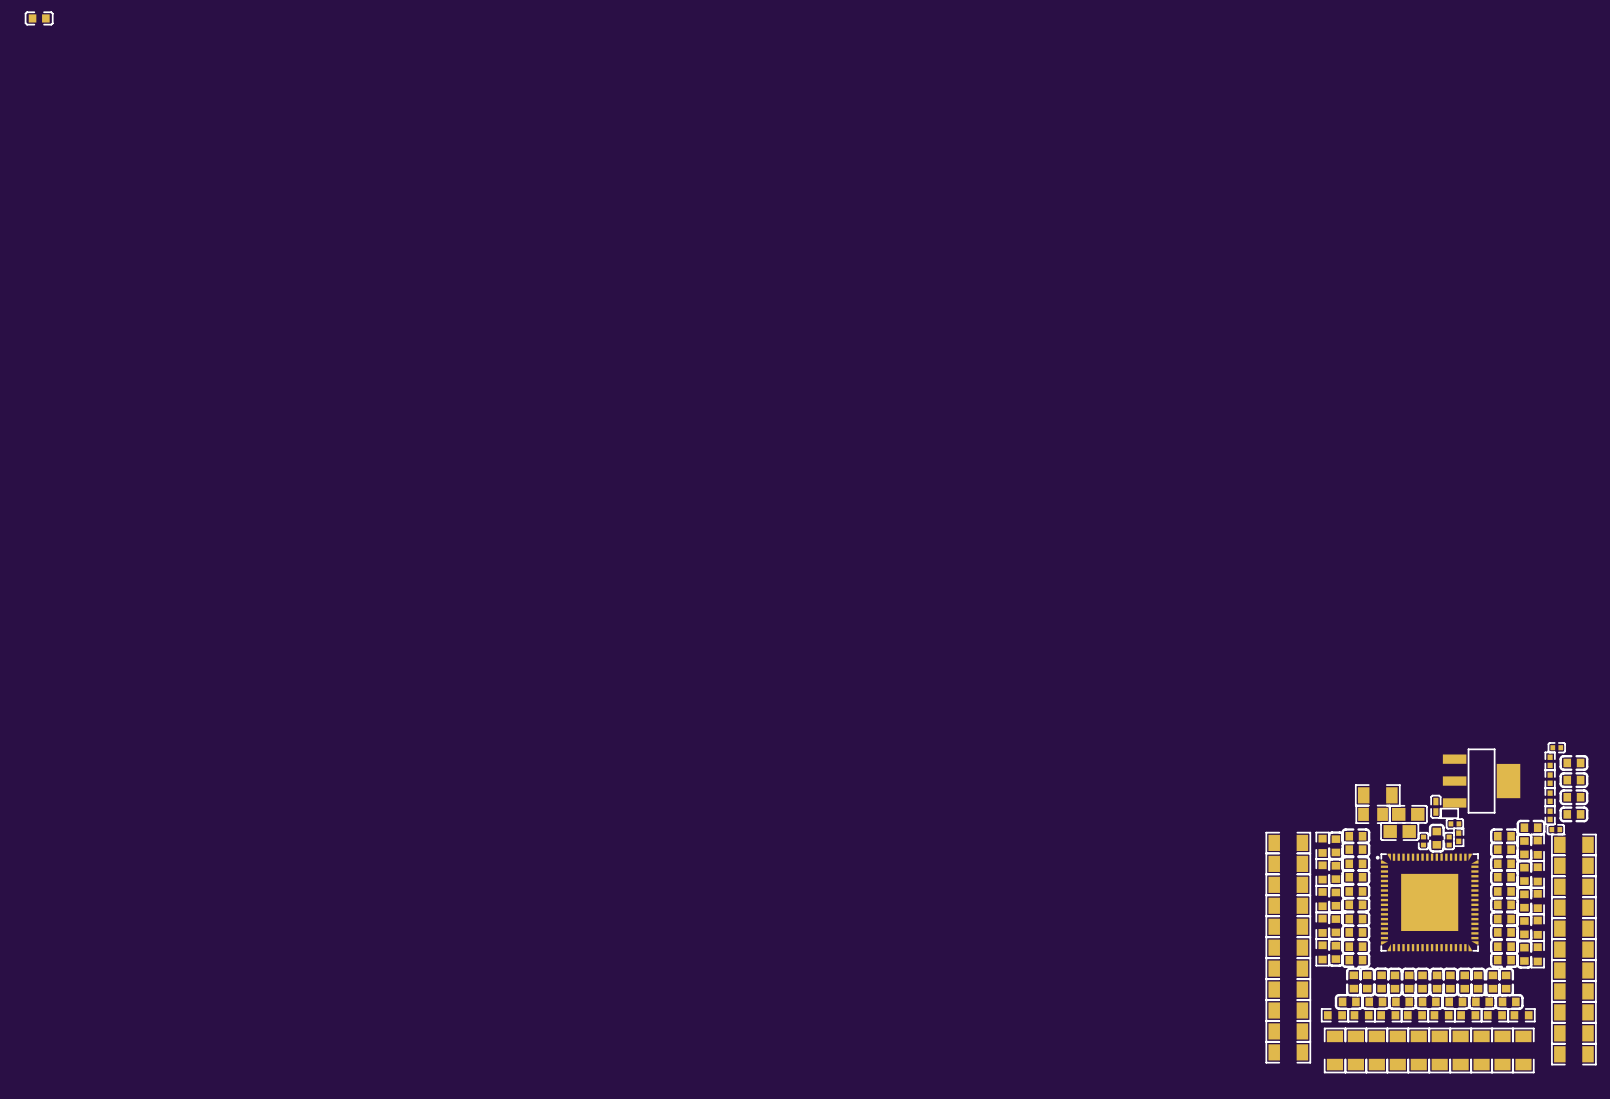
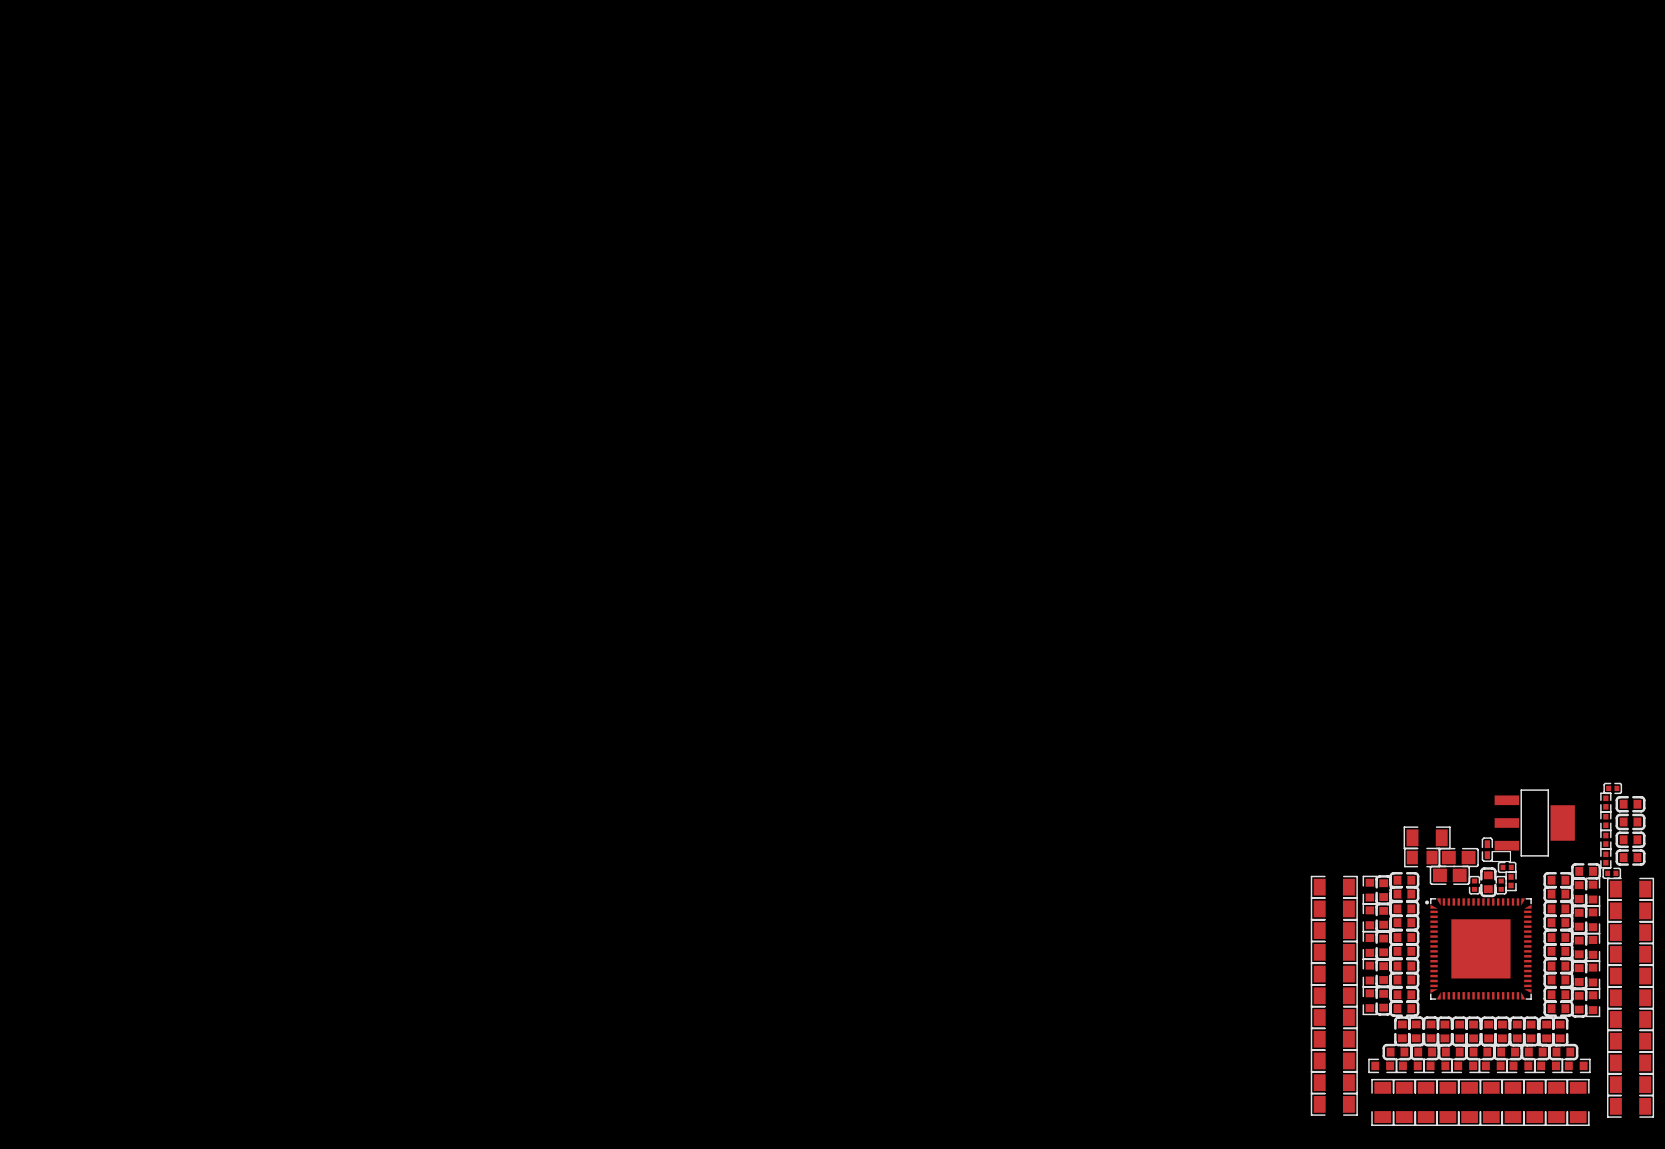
part: (39, 18) -> none

